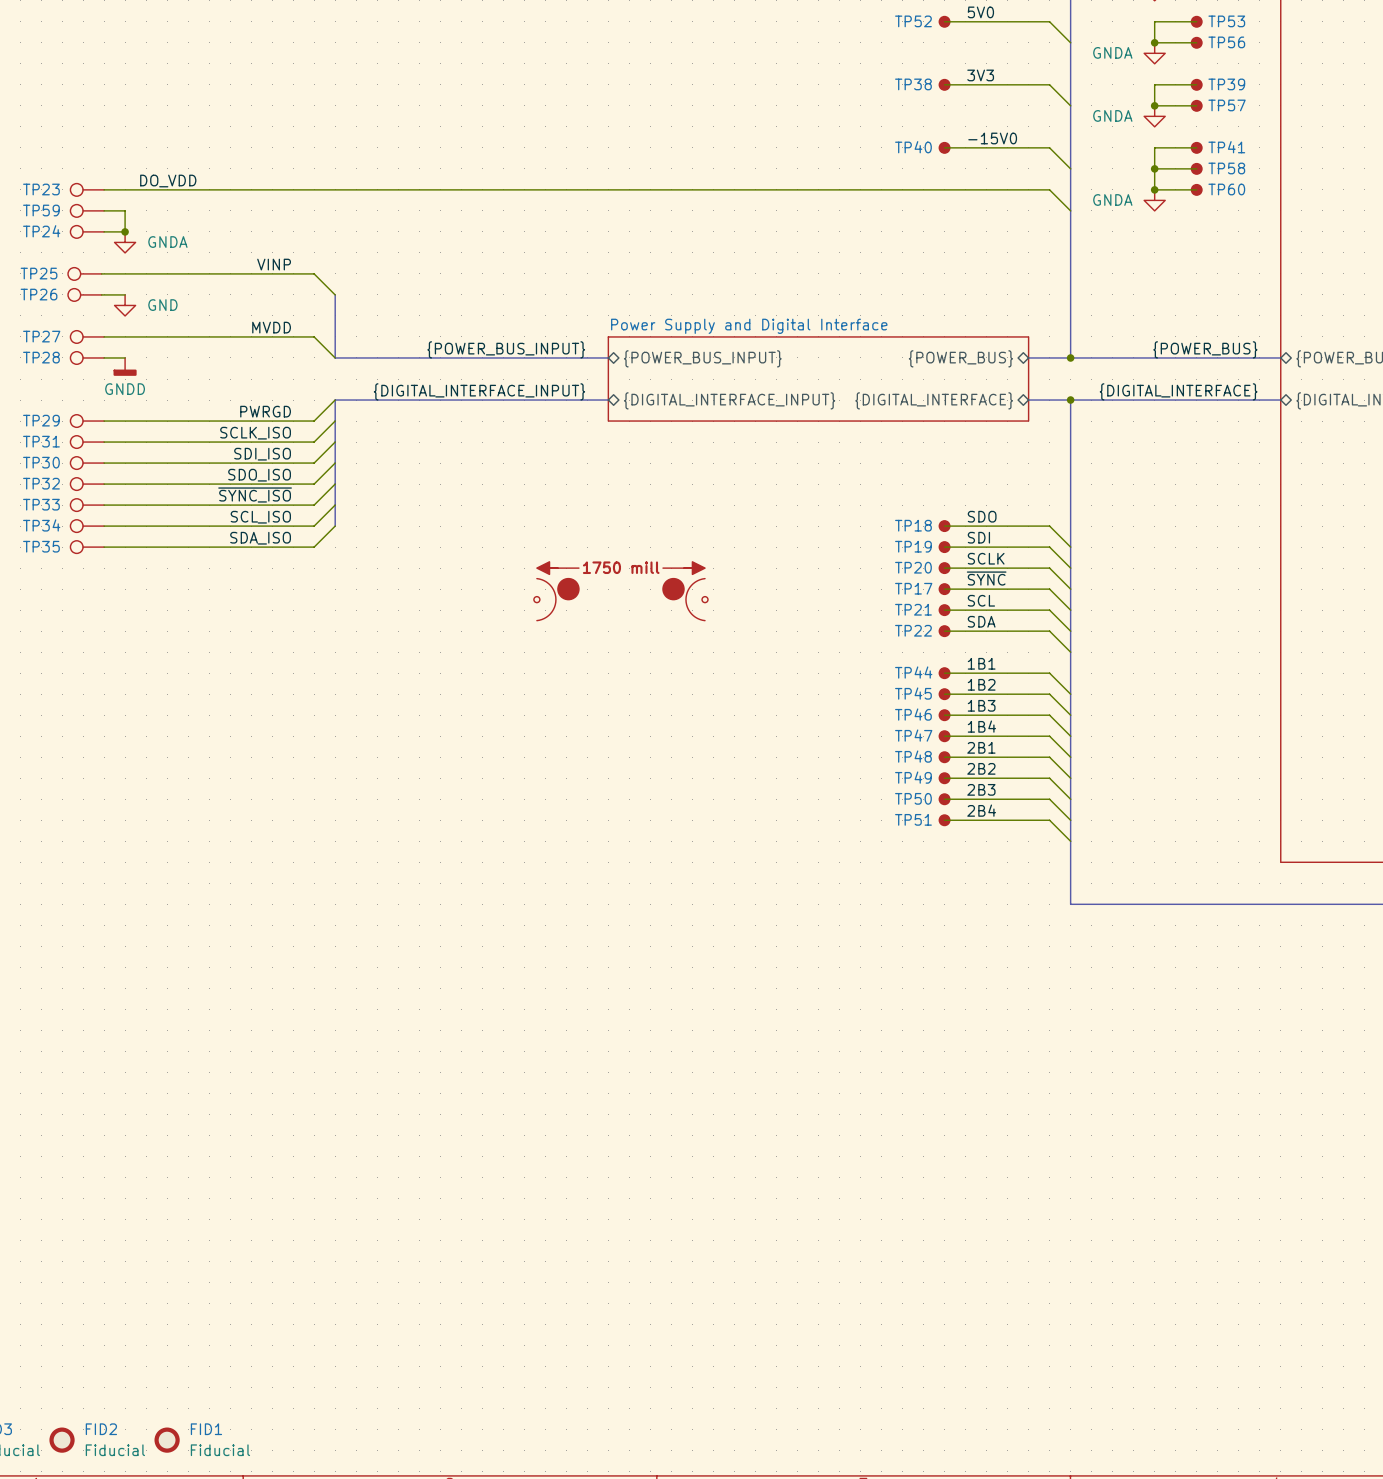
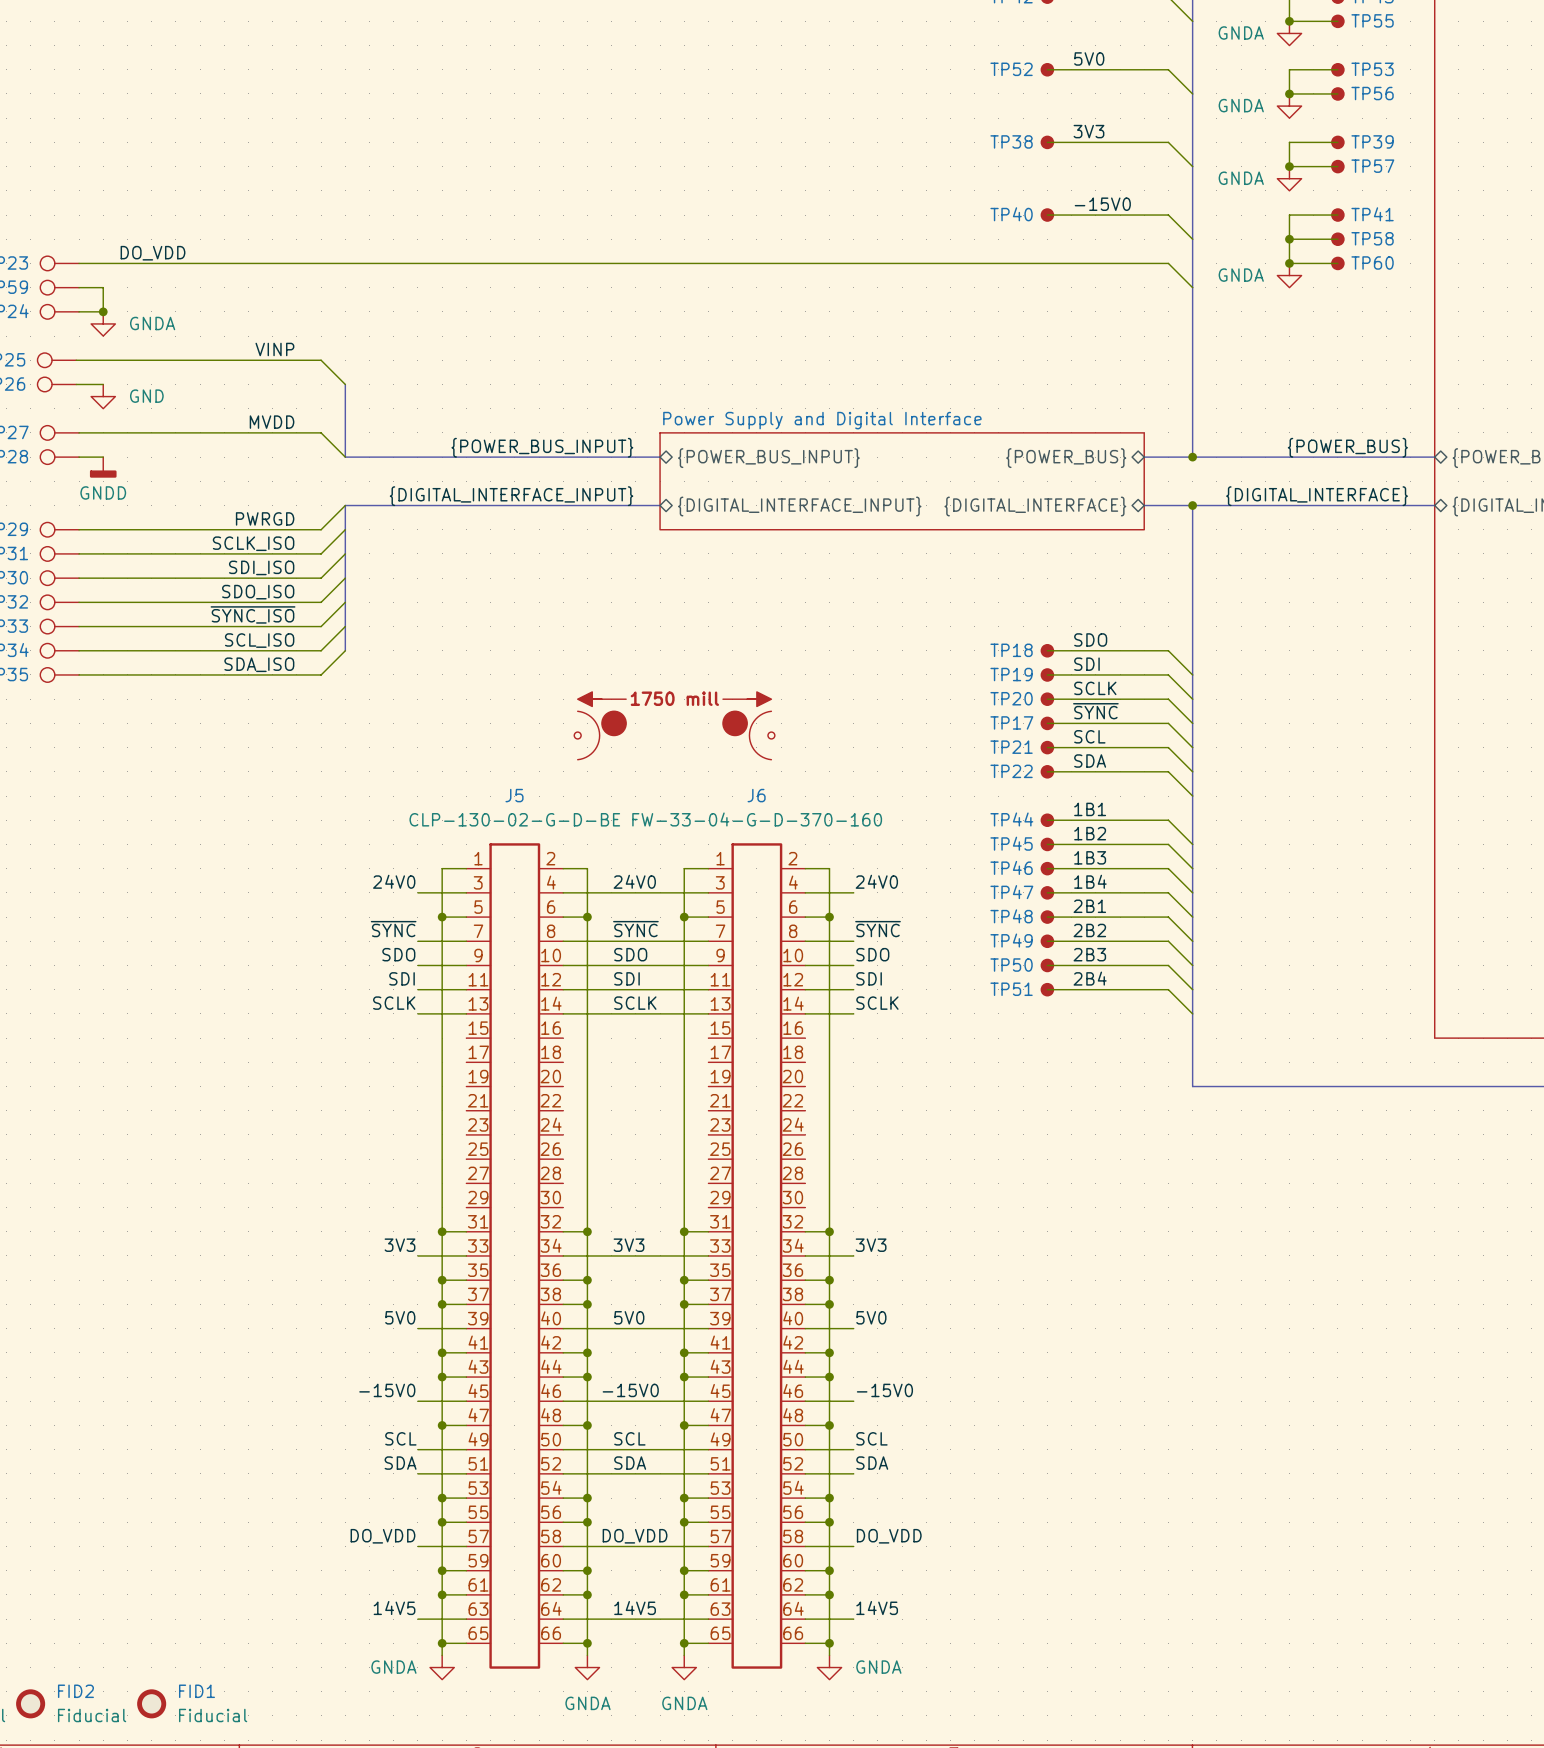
wire: none -> (466, 868) (442, 868) (442, 1655)
wire: none -> (563, 868) (587, 868) (587, 1655)
wire: none -> (708, 868) (684, 868) (684, 1655)
wire: none -> (805, 868) (829, 868) (829, 1655)
label: none -> 24V0 (394, 881)
label: none -> 24V0 (634, 881)
label: none -> 24V0 (876, 881)
wire: none -> (417, 892) (466, 892)
wire: none -> (563, 892) (708, 892)
wire: none -> (805, 892) (853, 892)
wire: none -> (442, 917) (466, 917)
junction: none -> (442, 917)
wire: none -> (563, 917) (587, 917)
junction: none -> (587, 917)
wire: none -> (684, 917) (708, 917)
junction: none -> (684, 917)
wire: none -> (805, 917) (829, 917)
junction: none -> (829, 917)
label: none -> ~{SYNC} (393, 929)
label: none -> ~{SYNC} (635, 929)
label: none -> ~{SYNC} (878, 929)
wire: none -> (417, 941) (466, 941)
wire: none -> (563, 941) (708, 941)
wire: none -> (805, 941) (853, 941)
label: none -> SDO (398, 954)
label: none -> SDO (630, 954)
label: none -> SDO (872, 954)
wire: none -> (417, 965) (466, 965)
wire: none -> (563, 965) (708, 965)
wire: none -> (805, 965) (853, 965)
label: none -> SDI (402, 978)
label: none -> SDI (626, 978)
label: none -> SDI (869, 978)
wire: none -> (417, 989) (466, 989)
wire: none -> (563, 989) (708, 989)
wire: none -> (805, 989) (853, 989)
label: none -> SCLK (394, 1003)
label: none -> SCLK (635, 1003)
label: none -> SCLK (877, 1003)
wire: none -> (417, 1013) (466, 1013)
wire: none -> (563, 1013) (708, 1013)
wire: none -> (805, 1013) (853, 1013)
wire: none -> (442, 1231) (466, 1231)
junction: none -> (442, 1231)
wire: none -> (563, 1231) (587, 1231)
junction: none -> (587, 1231)
wire: none -> (684, 1231) (708, 1231)
junction: none -> (684, 1231)
wire: none -> (805, 1231) (829, 1231)
junction: none -> (829, 1231)
label: none -> 3V3 (399, 1245)
label: none -> 3V3 (629, 1245)
label: none -> 3V3 (871, 1245)
wire: none -> (417, 1255) (466, 1255)
J5: none -> CLP-130-02-G-D-BE (514, 1255)
wire: none -> (563, 1255) (708, 1255)
J6: none -> FW-33-04-G-D-370-160 (756, 1255)
wire: none -> (805, 1255) (853, 1255)
wire: none -> (442, 1280) (466, 1280)
junction: none -> (442, 1280)
wire: none -> (563, 1280) (587, 1280)
junction: none -> (587, 1280)
wire: none -> (684, 1280) (708, 1280)
junction: none -> (684, 1280)
wire: none -> (805, 1280) (829, 1280)
junction: none -> (829, 1280)
wire: none -> (442, 1304) (466, 1304)
junction: none -> (442, 1304)
wire: none -> (563, 1304) (587, 1304)
junction: none -> (587, 1304)
wire: none -> (684, 1304) (708, 1304)
junction: none -> (684, 1304)
wire: none -> (805, 1304) (829, 1304)
junction: none -> (829, 1304)
label: none -> 5V0 (400, 1317)
label: none -> 5V0 (629, 1317)
label: none -> 5V0 (871, 1317)
wire: none -> (417, 1328) (466, 1328)
wire: none -> (563, 1328) (708, 1328)
wire: none -> (805, 1328) (853, 1328)
wire: none -> (442, 1352) (466, 1352)
junction: none -> (442, 1352)
wire: none -> (563, 1352) (587, 1352)
junction: none -> (587, 1352)
wire: none -> (684, 1352) (708, 1352)
junction: none -> (684, 1352)
wire: none -> (805, 1352) (829, 1352)
junction: none -> (829, 1352)
wire: none -> (442, 1377) (466, 1377)
junction: none -> (442, 1377)
wire: none -> (563, 1377) (587, 1377)
junction: none -> (587, 1377)
wire: none -> (684, 1377) (708, 1377)
junction: none -> (684, 1377)
wire: none -> (805, 1377) (829, 1377)
junction: none -> (829, 1377)
label: none -> -15V0 (387, 1390)
label: none -> -15V0 (630, 1390)
label: none -> -15V0 (884, 1390)
wire: none -> (417, 1401) (466, 1401)
wire: none -> (563, 1401) (708, 1401)
wire: none -> (805, 1401) (853, 1401)
wire: none -> (442, 1425) (466, 1425)
junction: none -> (442, 1425)
wire: none -> (563, 1425) (587, 1425)
junction: none -> (587, 1425)
wire: none -> (684, 1425) (708, 1425)
junction: none -> (684, 1425)
wire: none -> (805, 1425) (829, 1425)
junction: none -> (829, 1425)
label: none -> SCL (400, 1438)
label: none -> SCL (629, 1438)
label: none -> SCL (871, 1438)
wire: none -> (417, 1449) (466, 1449)
wire: none -> (563, 1449) (708, 1449)
wire: none -> (805, 1449) (853, 1449)
label: none -> SDA (400, 1463)
label: none -> SDA (630, 1463)
label: none -> SDA (872, 1463)
wire: none -> (417, 1473) (466, 1473)
wire: none -> (563, 1473) (708, 1473)
wire: none -> (805, 1473) (853, 1473)
wire: none -> (442, 1498) (466, 1498)
junction: none -> (442, 1498)
wire: none -> (563, 1498) (587, 1498)
junction: none -> (587, 1498)
wire: none -> (684, 1498) (708, 1498)
junction: none -> (684, 1498)
wire: none -> (805, 1498) (829, 1498)
junction: none -> (829, 1498)
wire: none -> (442, 1522) (466, 1522)
junction: none -> (442, 1522)
wire: none -> (563, 1522) (587, 1522)
junction: none -> (587, 1522)
wire: none -> (684, 1522) (708, 1522)
junction: none -> (684, 1522)
wire: none -> (805, 1522) (829, 1522)
junction: none -> (829, 1522)
label: none -> DO_VDD (382, 1536)
label: none -> DO_VDD (635, 1536)
label: none -> DO_VDD (889, 1536)
wire: none -> (417, 1546) (466, 1546)
wire: none -> (563, 1546) (708, 1546)
wire: none -> (805, 1546) (853, 1546)
wire: none -> (442, 1570) (466, 1570)
junction: none -> (442, 1570)
wire: none -> (563, 1570) (587, 1570)
junction: none -> (587, 1570)
wire: none -> (684, 1570) (708, 1570)
junction: none -> (684, 1570)
wire: none -> (805, 1570) (829, 1570)
junction: none -> (829, 1570)
wire: none -> (442, 1594) (466, 1594)
junction: none -> (442, 1594)
wire: none -> (563, 1594) (587, 1594)
junction: none -> (587, 1594)
wire: none -> (684, 1594) (708, 1594)
junction: none -> (684, 1594)
wire: none -> (805, 1594) (829, 1594)
junction: none -> (829, 1594)
label: none -> 14V5 (394, 1608)
label: none -> 14V5 (635, 1608)
label: none -> 14V5 (877, 1608)
wire: none -> (417, 1619) (466, 1619)
wire: none -> (563, 1619) (708, 1619)
wire: none -> (805, 1619) (853, 1619)
wire: none -> (442, 1643) (466, 1643)
junction: none -> (442, 1643)
wire: none -> (563, 1643) (587, 1643)
junction: none -> (587, 1643)
wire: none -> (684, 1643) (708, 1643)
junction: none -> (684, 1643)
wire: none -> (805, 1643) (829, 1643)
junction: none -> (829, 1643)
power symbol: none -> GNDA (442, 1667)
power symbol: none -> GNDA (587, 1667)
power symbol: none -> GNDA (684, 1667)
power symbol: none -> GNDA (829, 1667)

